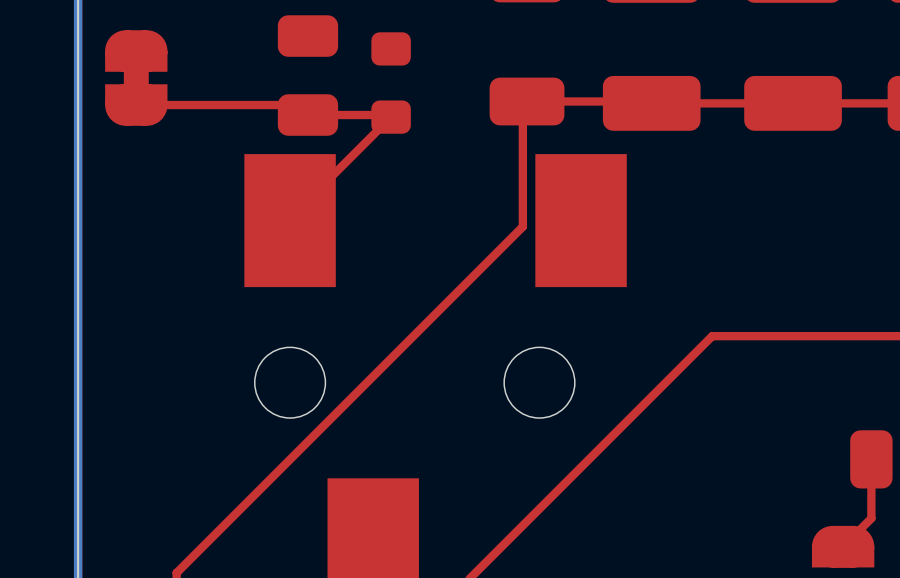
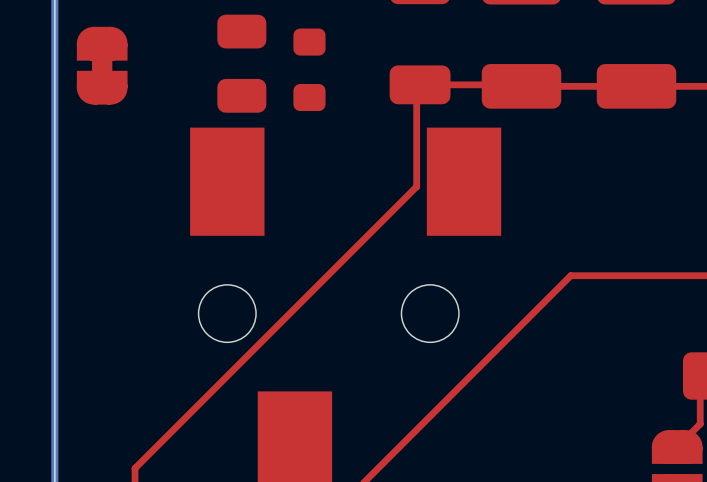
top track: (136, 105) (297, 105) (307, 115) (389, 115) (391, 117) (290, 218) (290, 220) -> none

